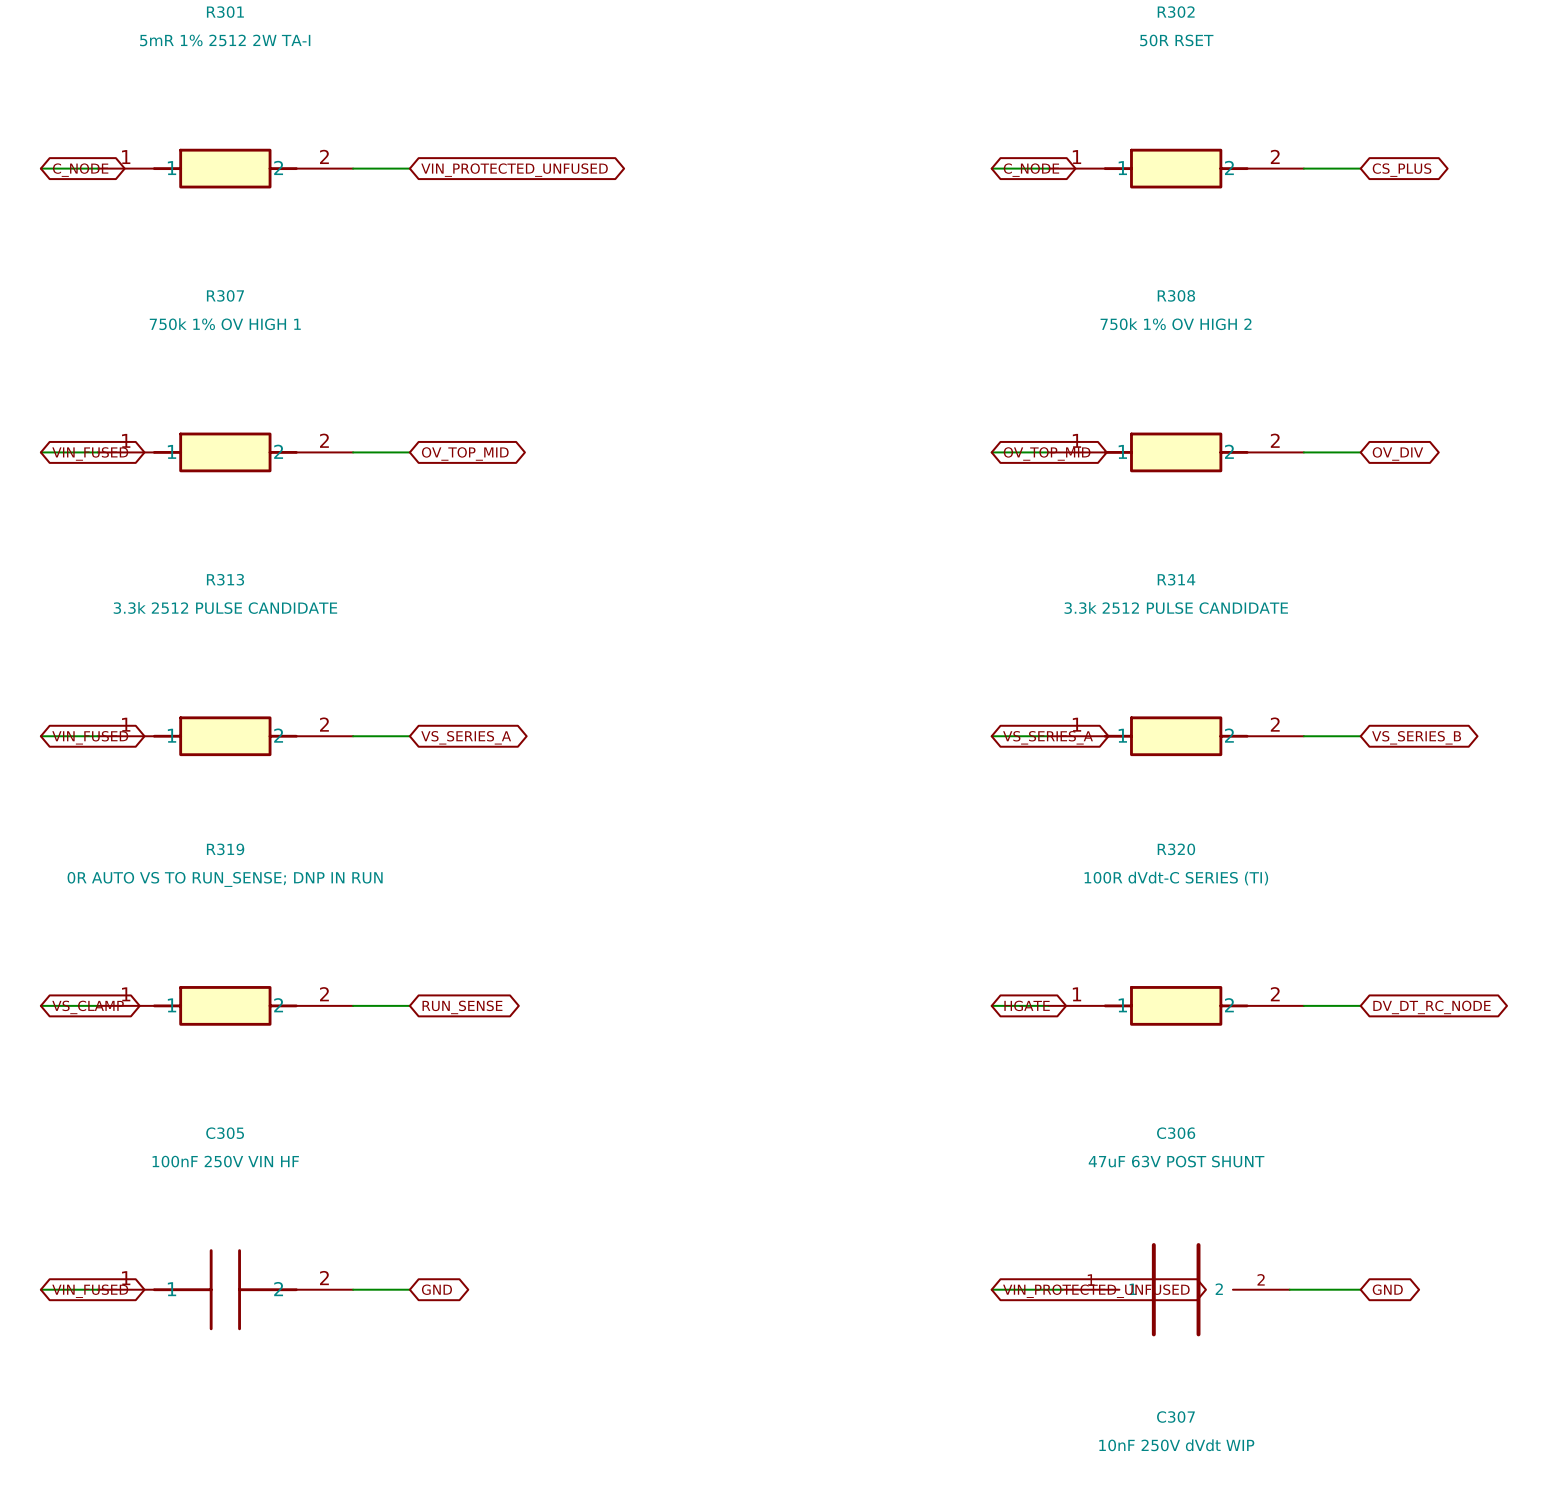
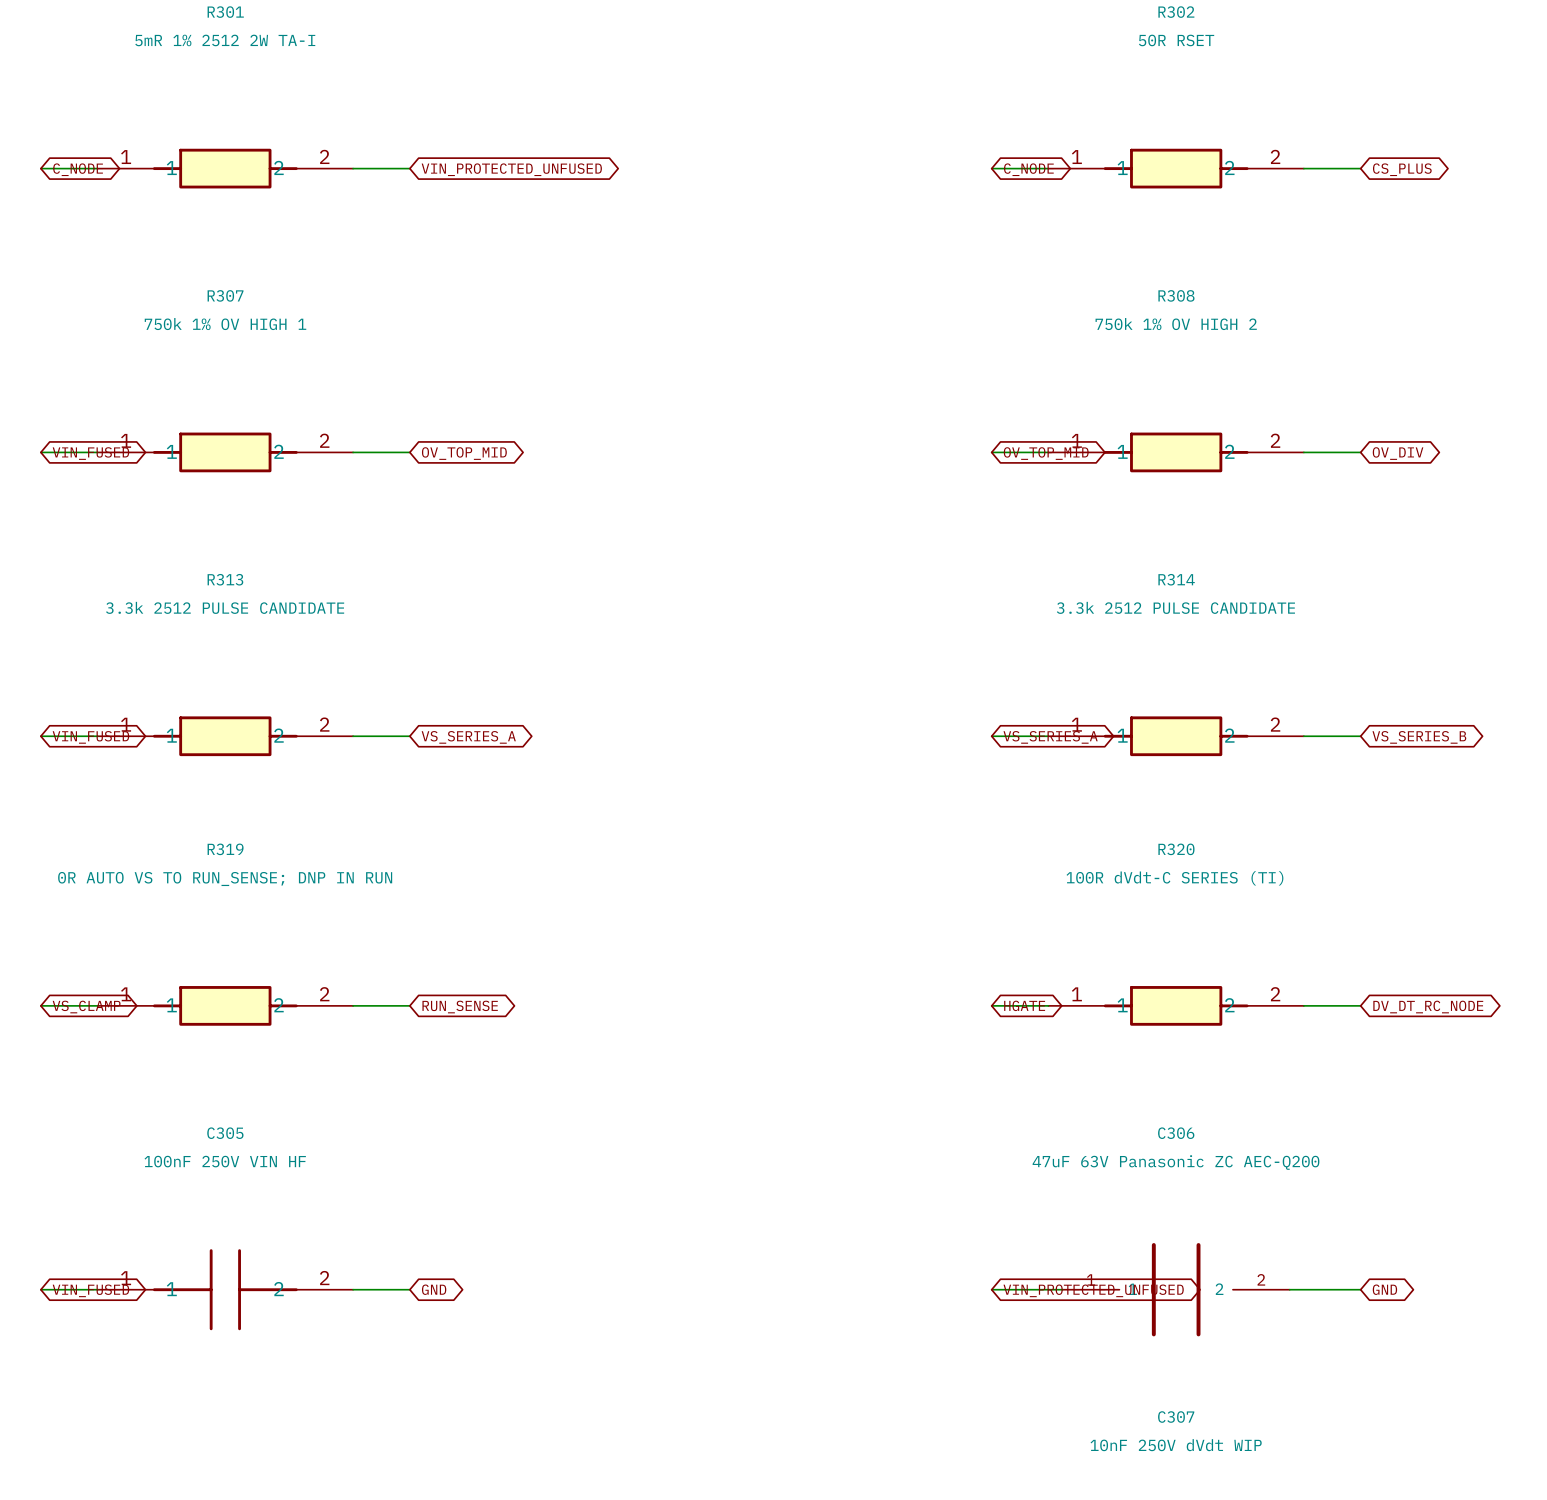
C306 value: 47uF 63V POST SHUNT (1176, 1161) -> 47uF 63V Panasonic ZC AEC-Q200 (1176, 1162)

